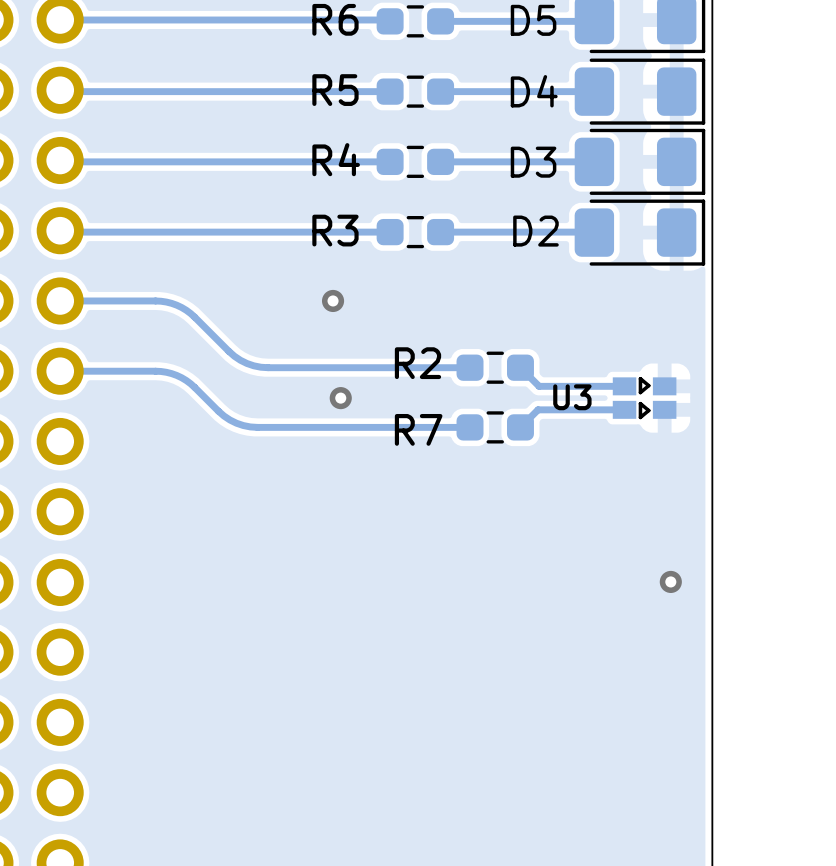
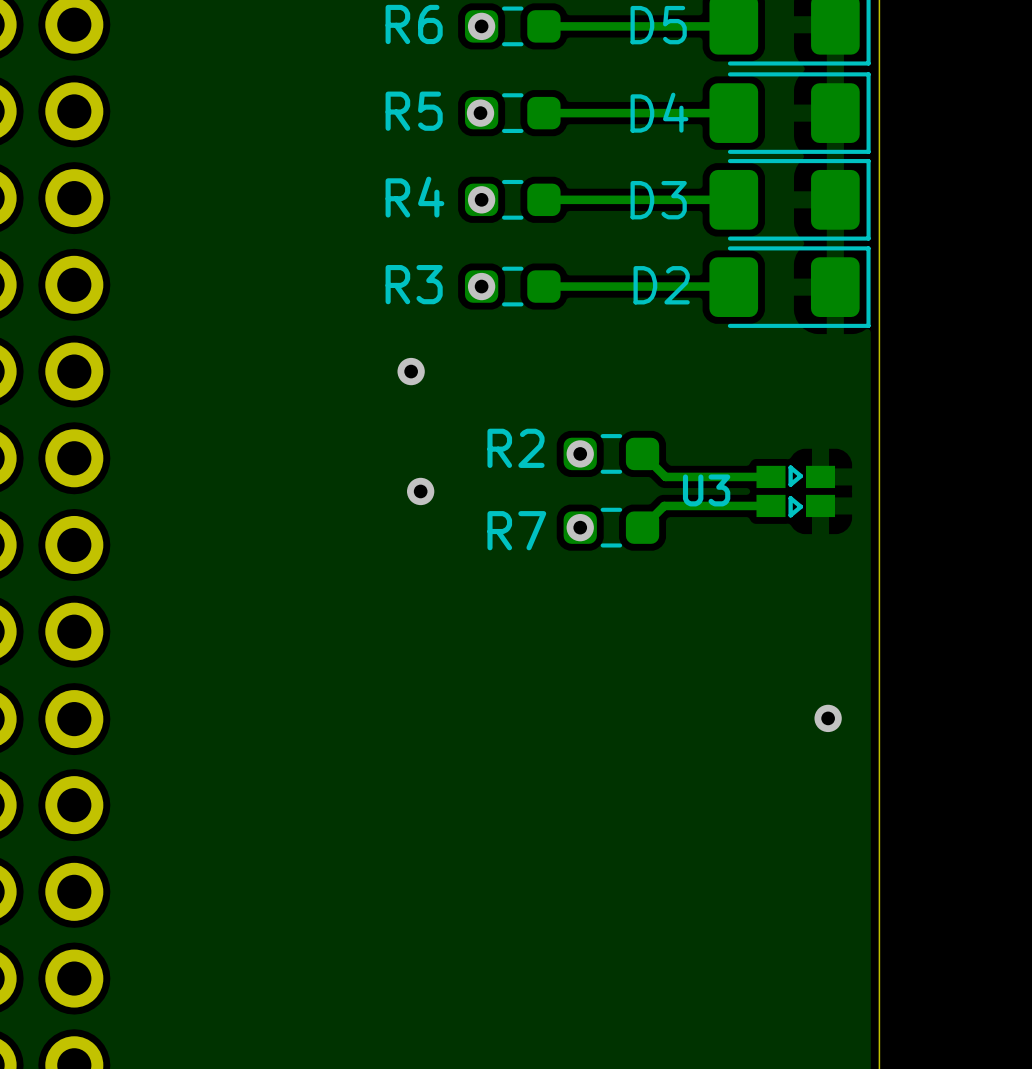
track: (60, 20) (390, 21) -> none
via: none -> (481, 26)
track: (60, 90) (390, 91) -> none
via: none -> (480, 113)
track: (60, 160) (390, 161) -> none
via: none -> (481, 199)
track: (60, 230) (390, 232) -> none
via: none -> (481, 286)
track: (60, 300) (155, 300) (171, 303) (190, 313) (234, 356) (246, 363) (260, 367) (470, 367) -> none
via: none -> (580, 453)
track: (60, 371) (155, 371) (171, 373) (190, 383) (223, 415) (236, 423) (250, 426) (470, 427) -> none
via: none -> (580, 527)

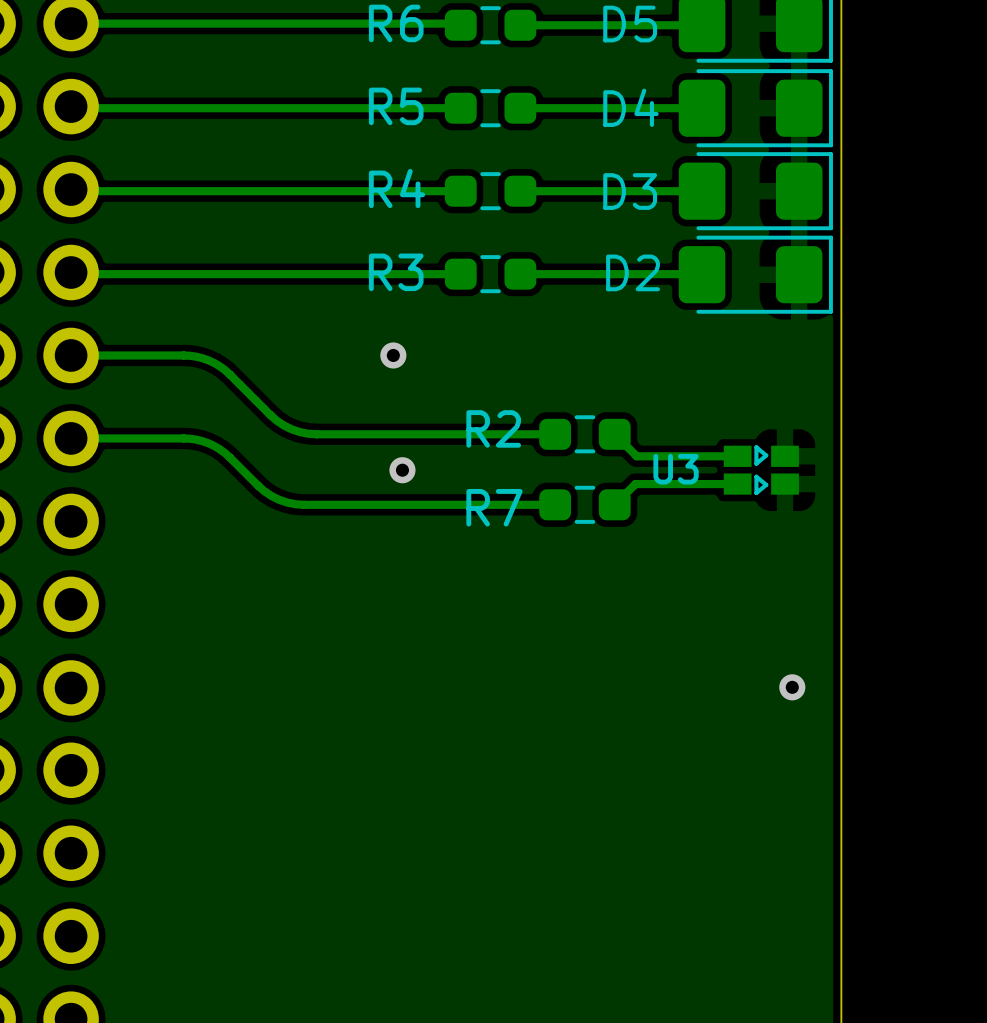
track: none -> (71, 23) (459, 23) (460, 25)
via: (481, 26) -> none
track: none -> (71, 106) (72, 108) (460, 108)
via: (480, 113) -> none
track: none -> (71, 189) (72, 191) (460, 191)
via: (481, 199) -> none
track: none -> (71, 272) (72, 274) (460, 274)
via: (481, 286) -> none
track: none -> (71, 355) (183, 355) (202, 358) (225, 370) (276, 420) (291, 429) (308, 433) (555, 434)
via: (580, 453) -> none
track: none -> (71, 438) (183, 438) (202, 441) (225, 453) (264, 491) (279, 499) (295, 504) (555, 504)
via: (580, 527) -> none

